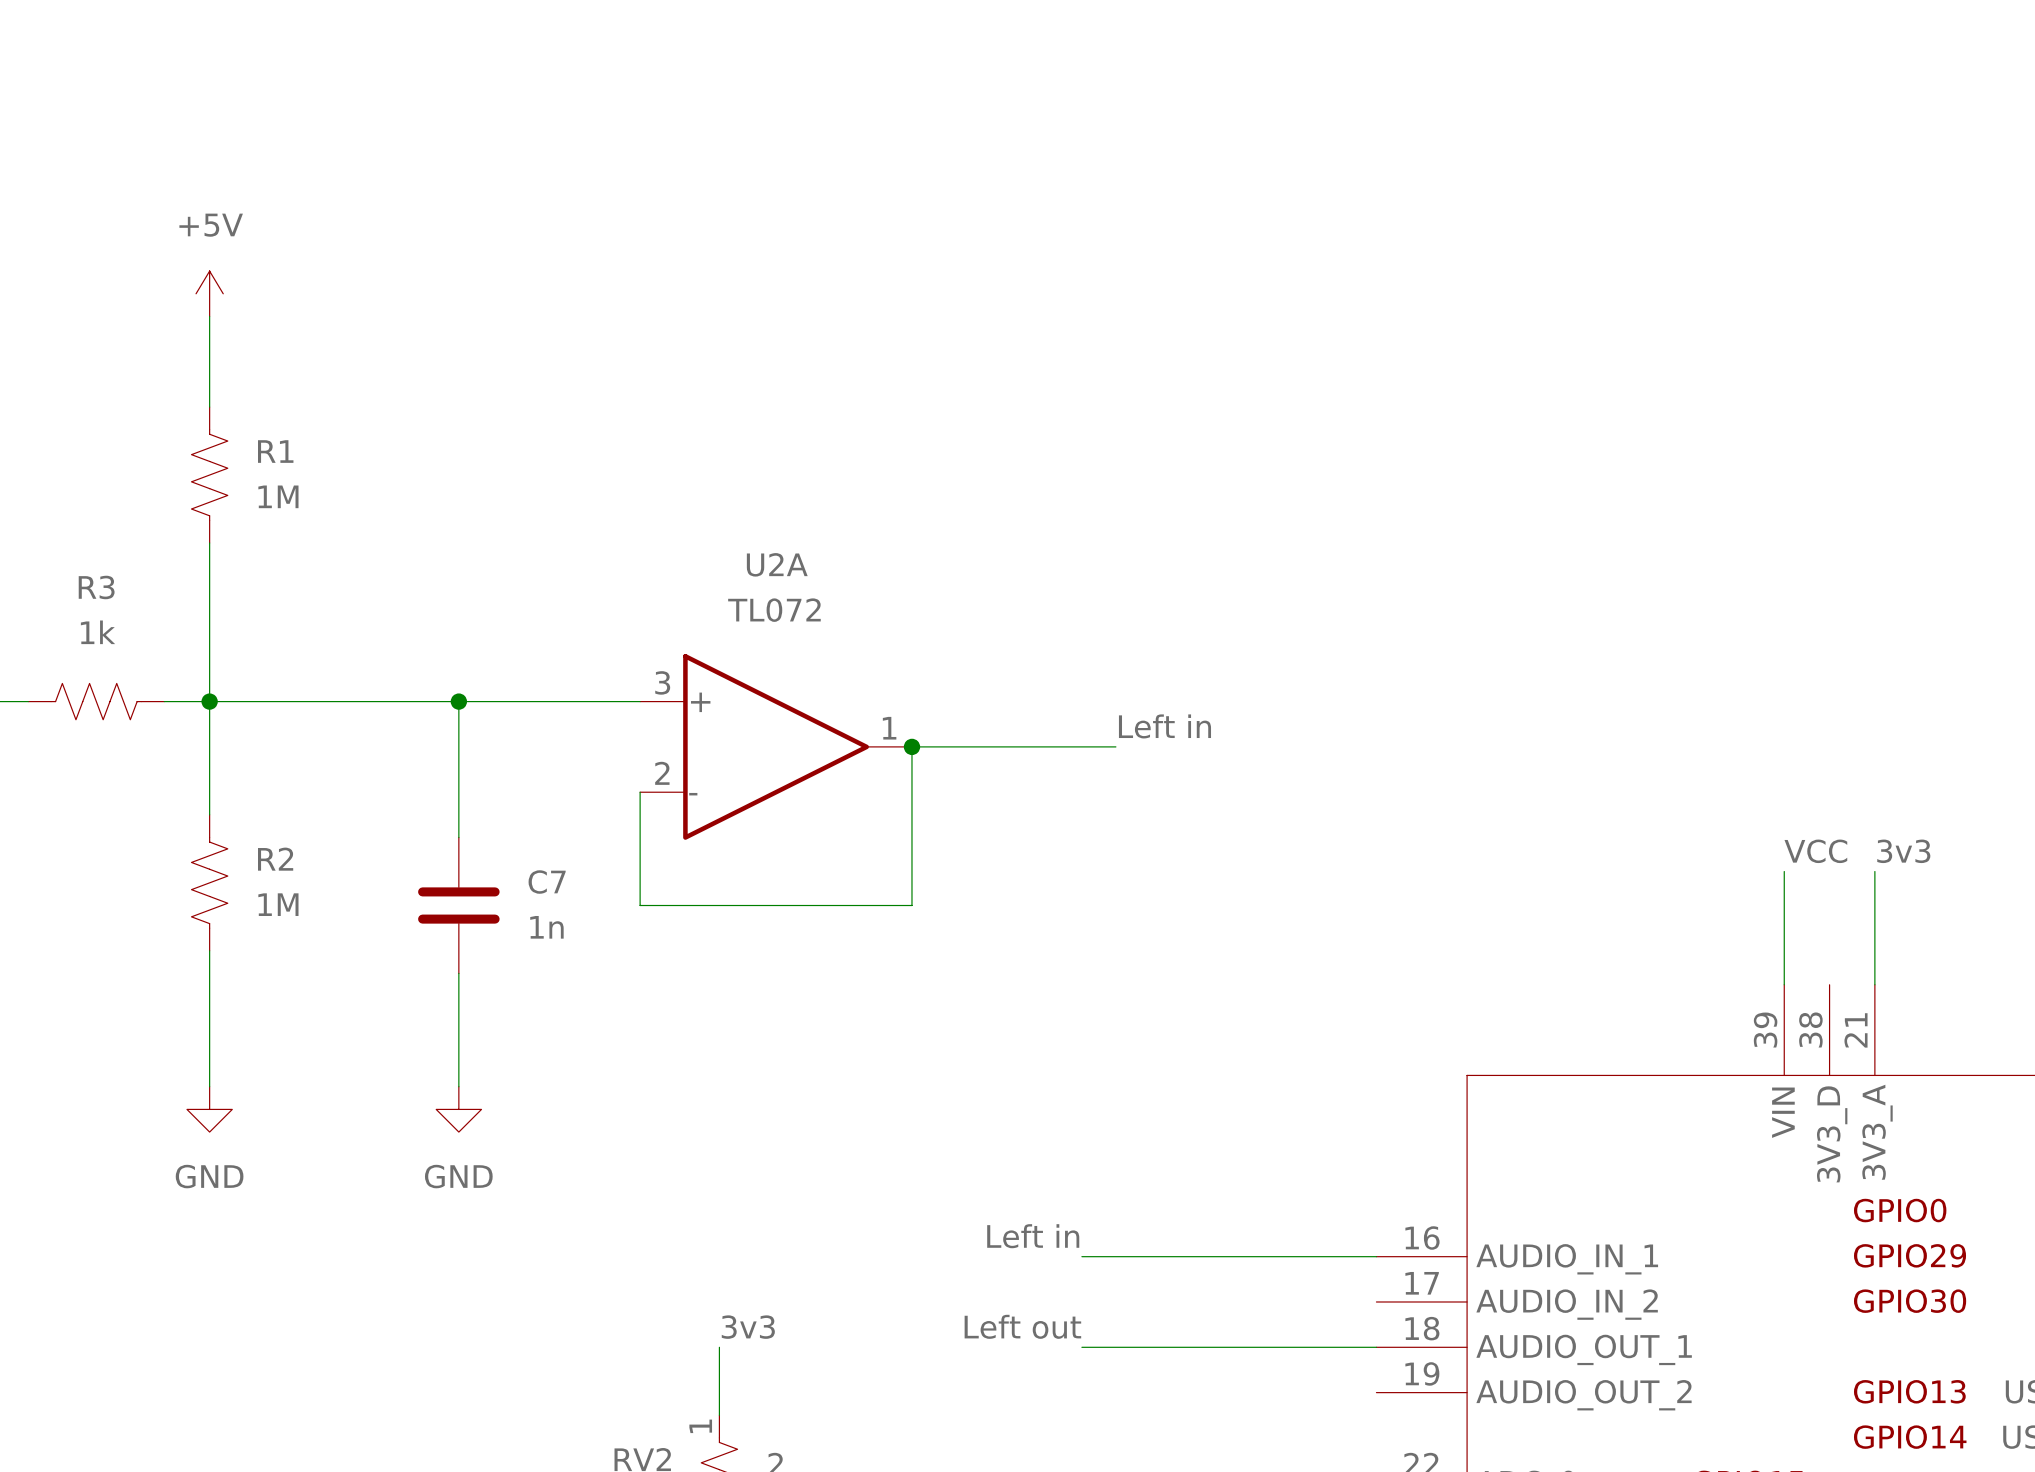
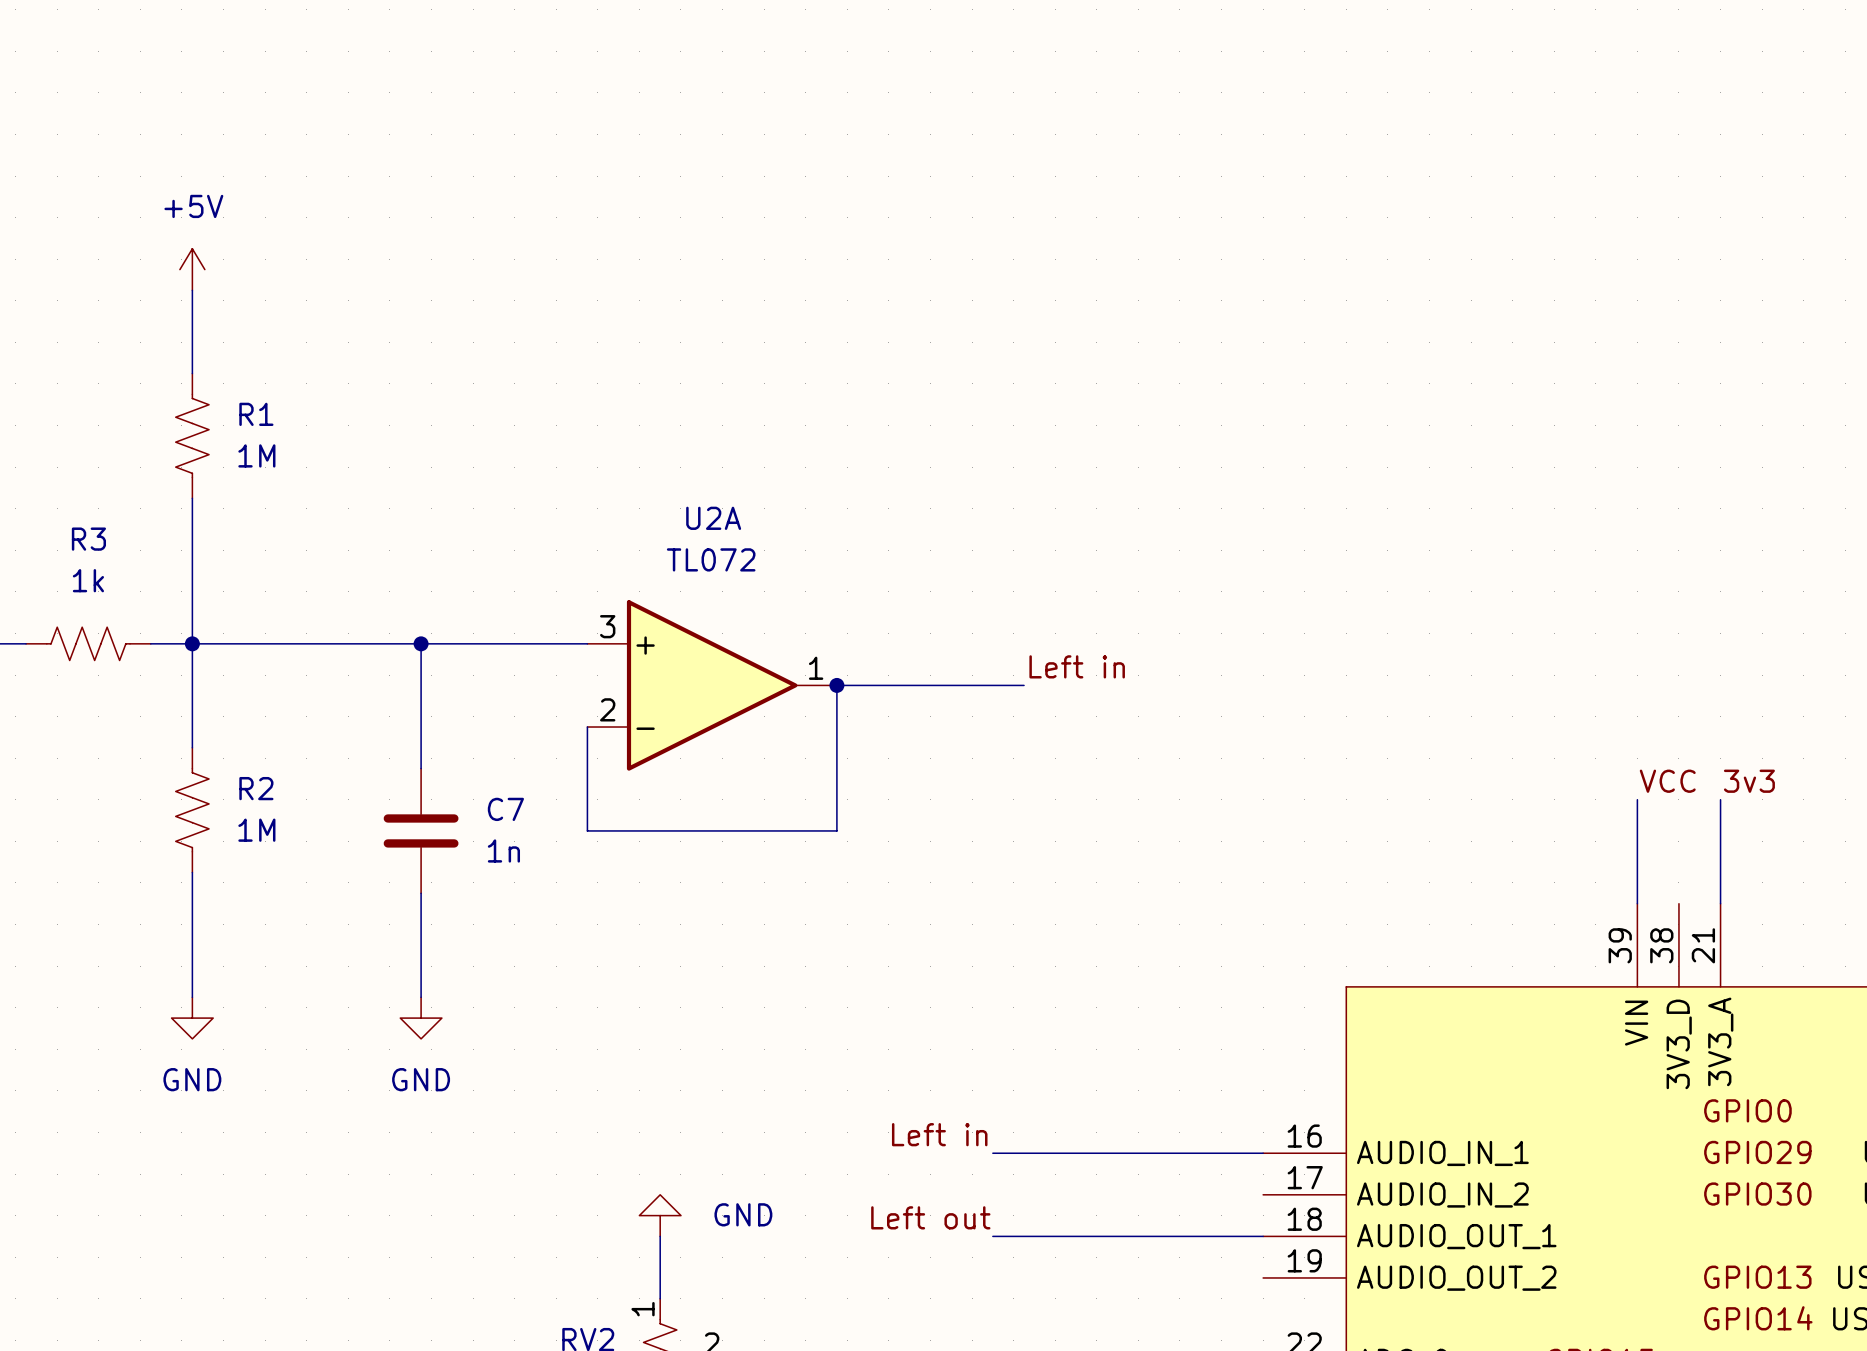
power symbol: none -> GND (660, 1215)
label: 3v3 (748, 1327) -> none

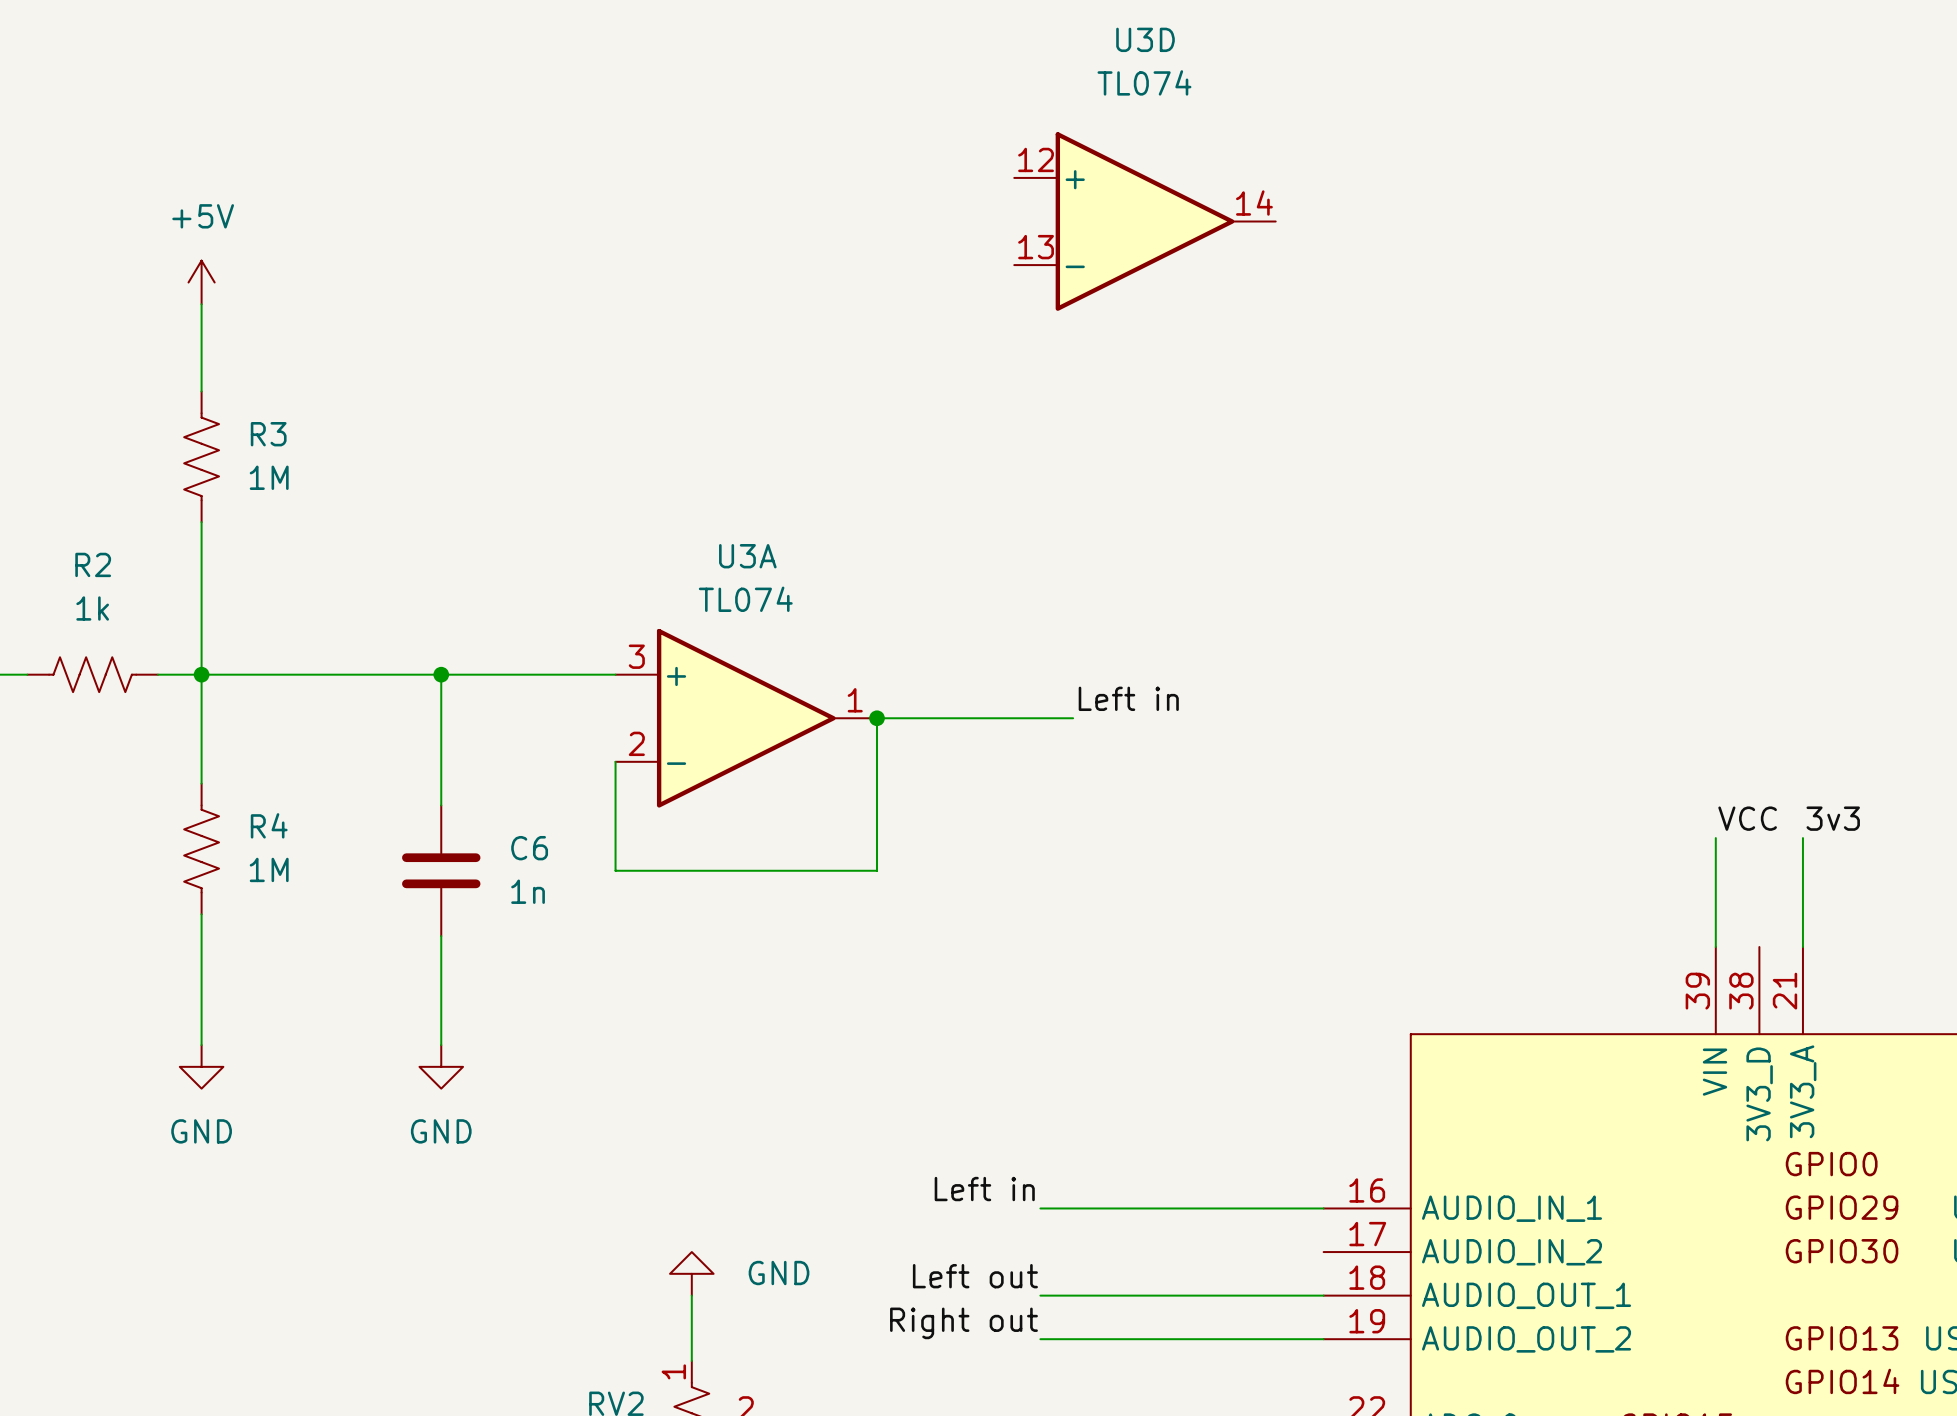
U3D: none -> TL074 (1144, 221)
R1 name: R1 (256, 414) -> R3 (268, 434)
U2A name: U2A (713, 518) -> U3A (747, 556)
R3 name: R3 (88, 539) -> R2 (93, 564)
U2A value: TL072 (711, 559) -> TL074 (745, 599)
R2 name: R2 (256, 788) -> R4 (269, 825)
C7 name: C7 (505, 809) -> C6 (529, 848)
label: none -> Right out (963, 1323)
wire: none -> (1040, 1339) (1323, 1339)

